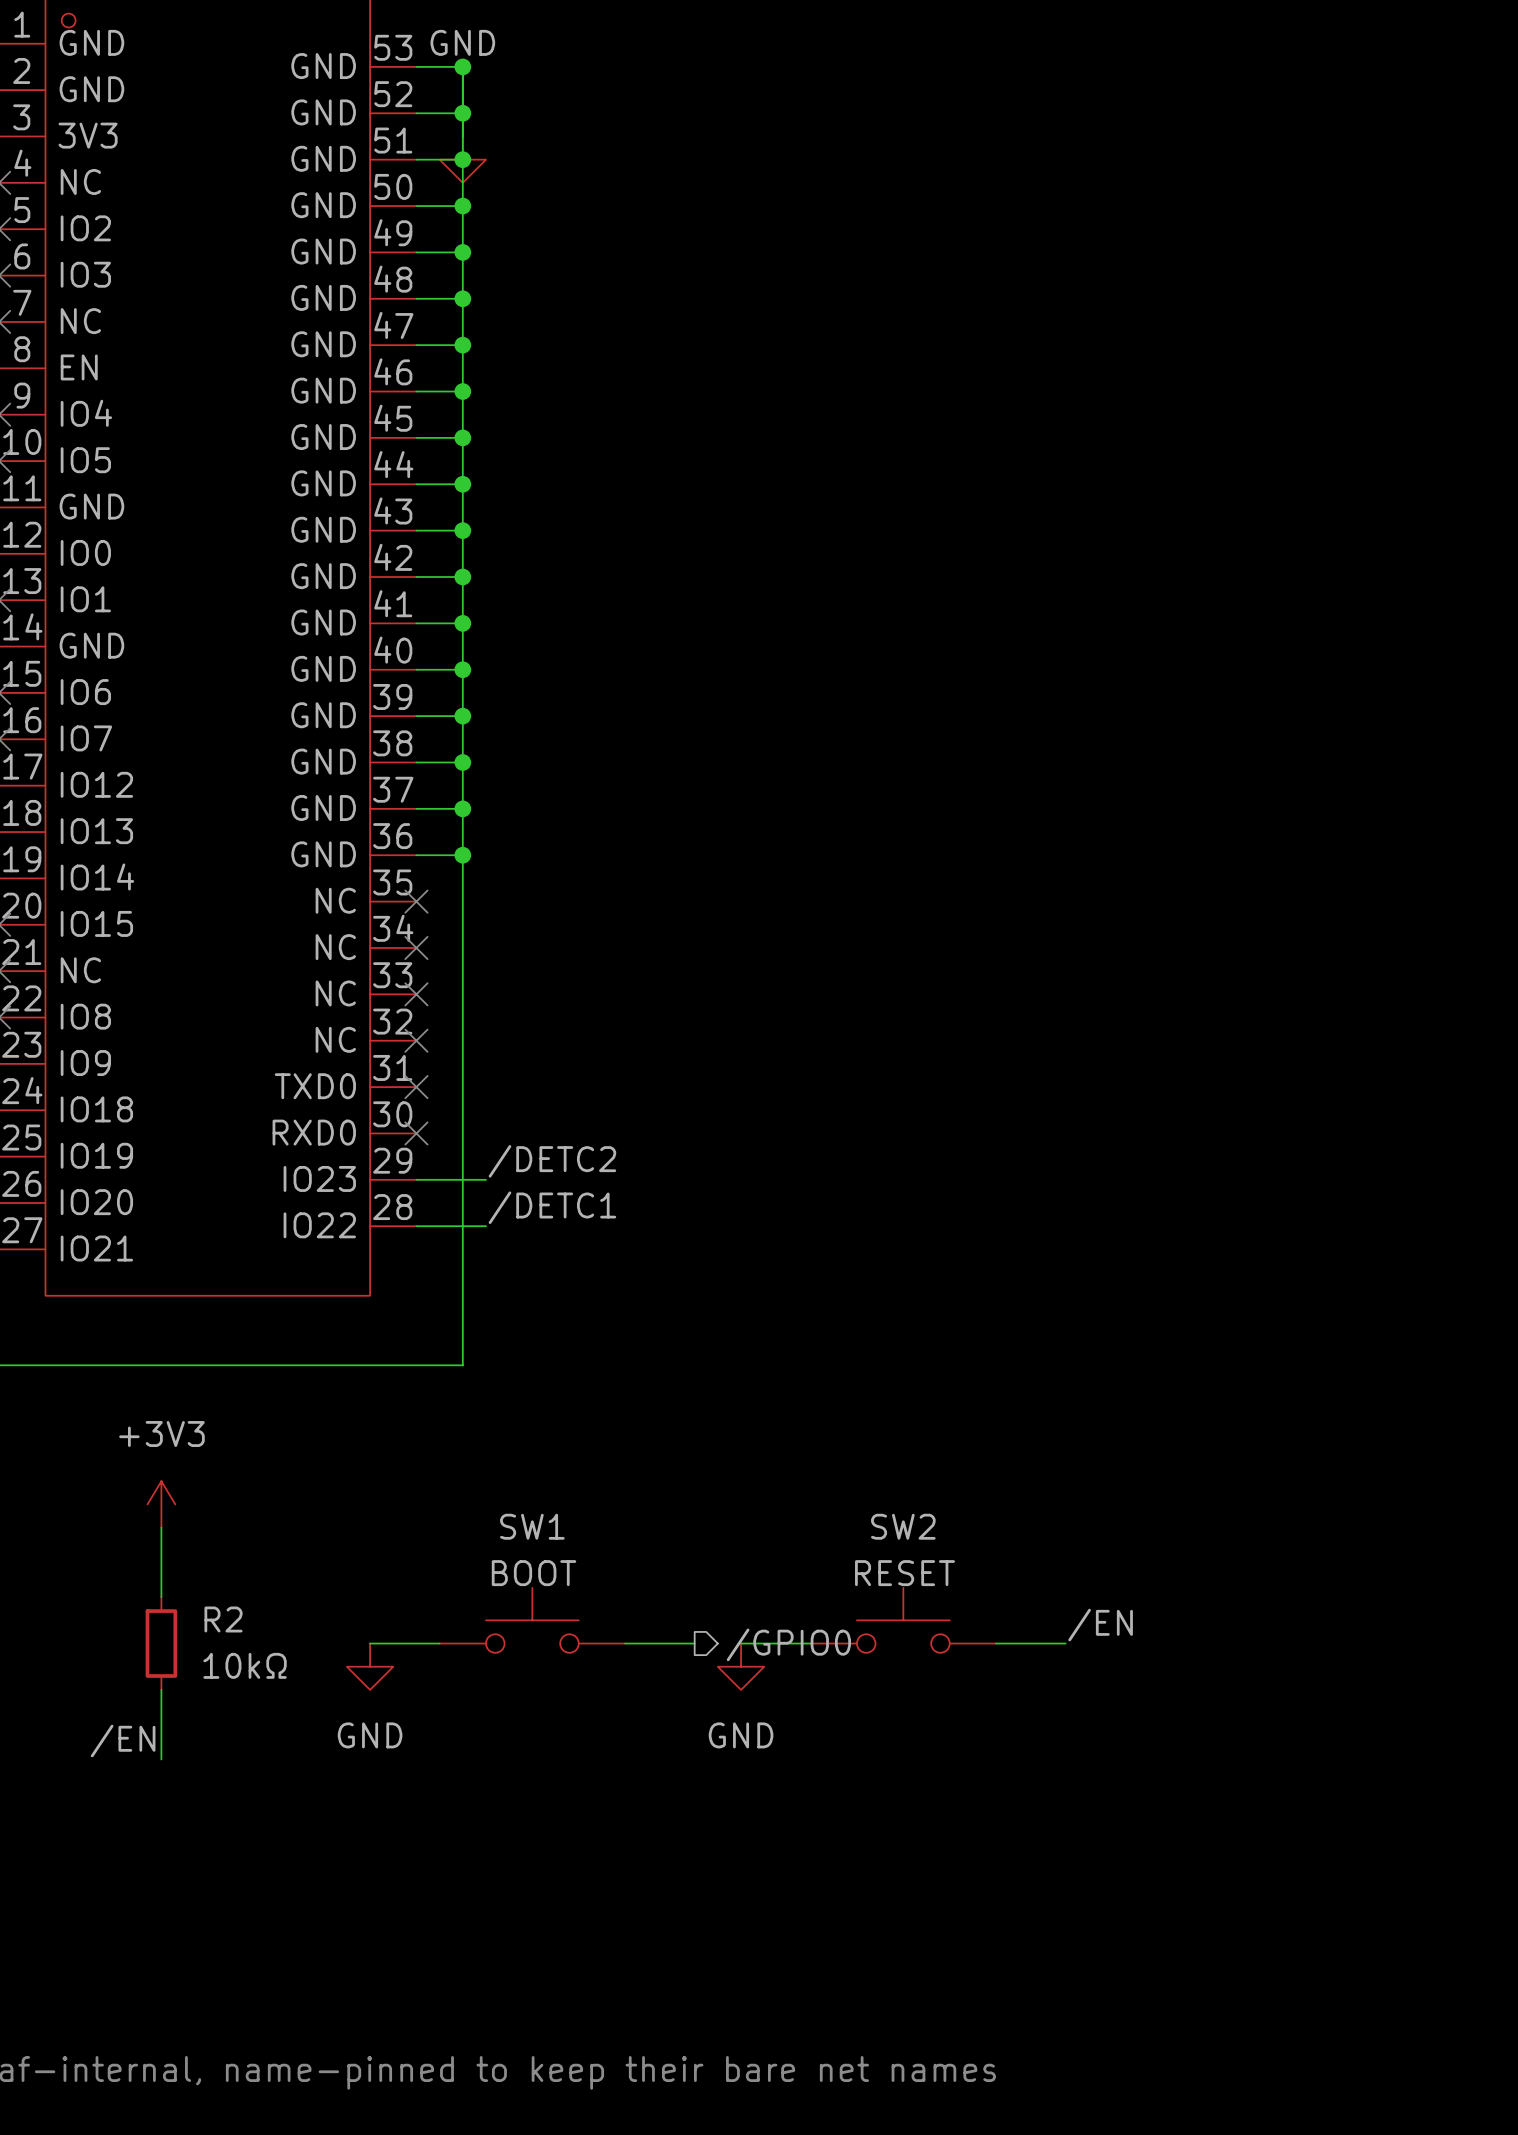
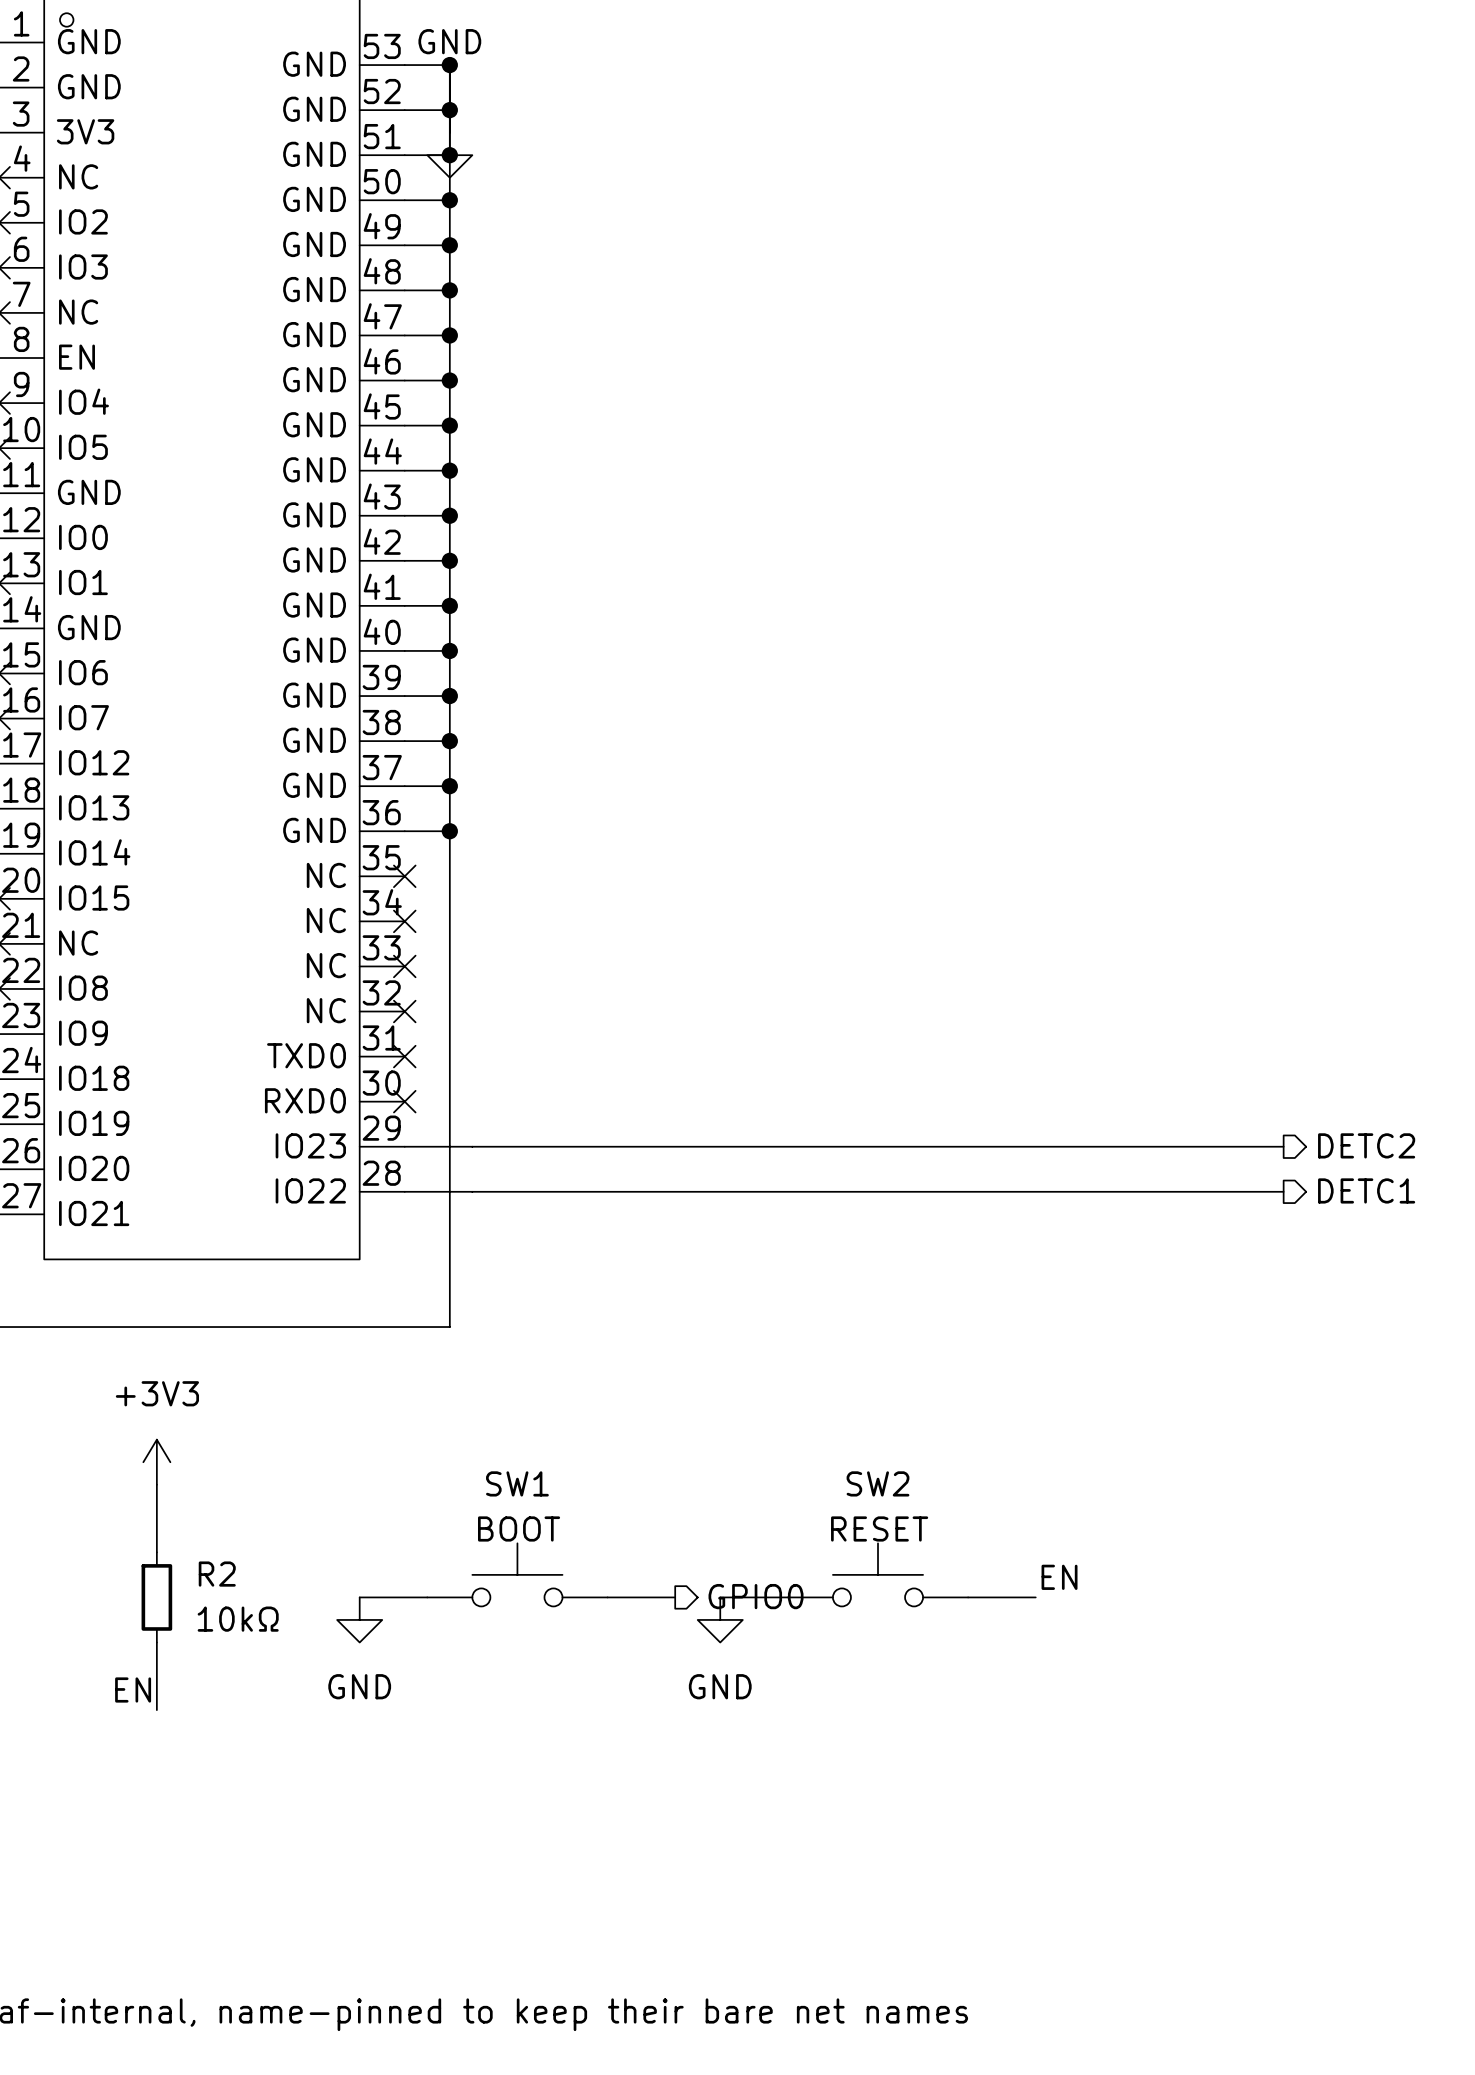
label: /DETC2 (552, 1161) -> none
hierarchical label: none -> DETC2 (1366, 1145)
wire: none -> (472, 1146) (1283, 1146)
label: /DETC1 (552, 1207) -> none
hierarchical label: none -> DETC1 (1366, 1190)
wire: none -> (472, 1191) (1283, 1191)
label: /EN (1100, 1625) -> EN (1059, 1577)
hierarchical label: /GPIO0 (788, 1644) -> GPIO0 (756, 1596)
label: /EN (123, 1740) -> EN (133, 1689)

